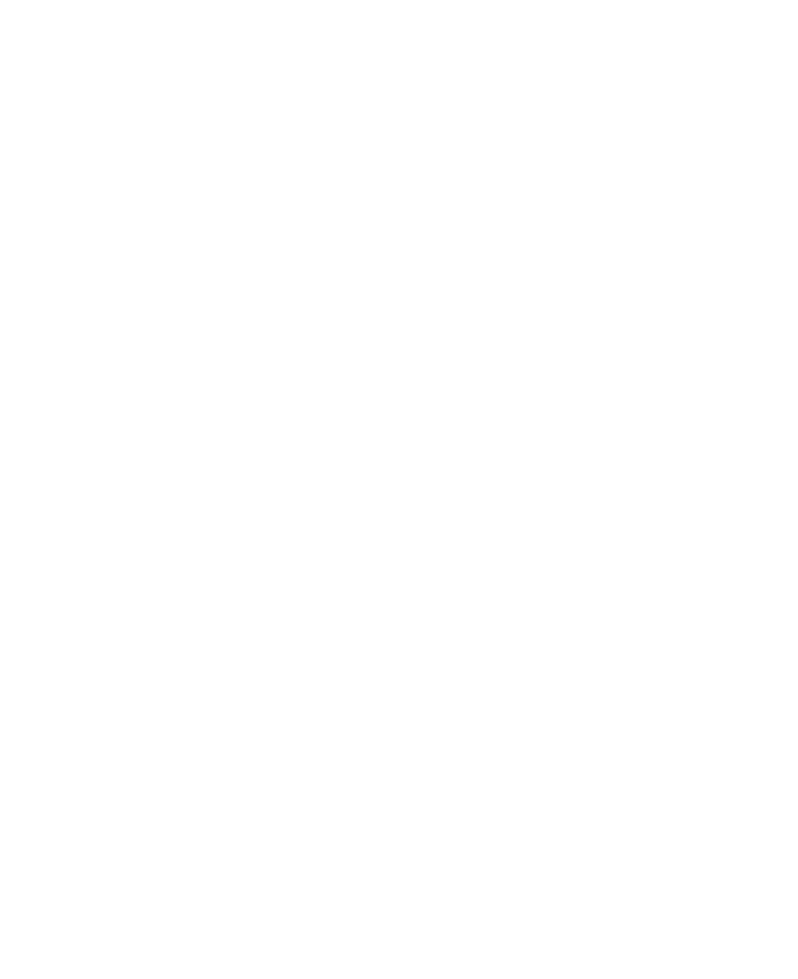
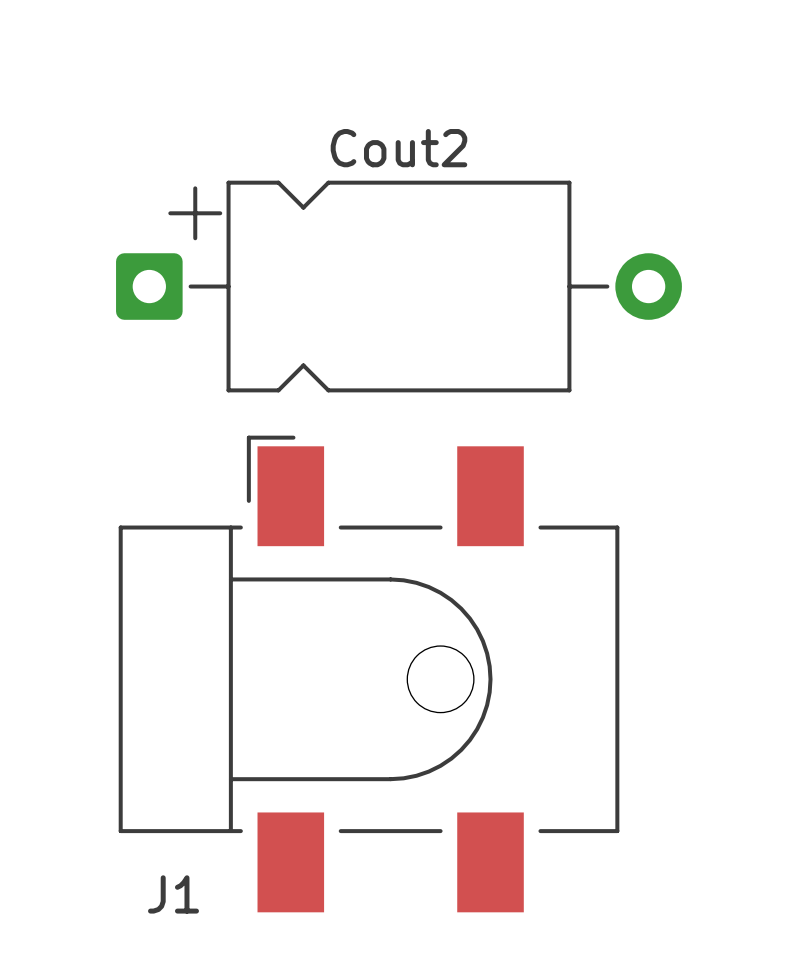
Cout2: none -> (398, 286)
J1: none -> (369, 673)

